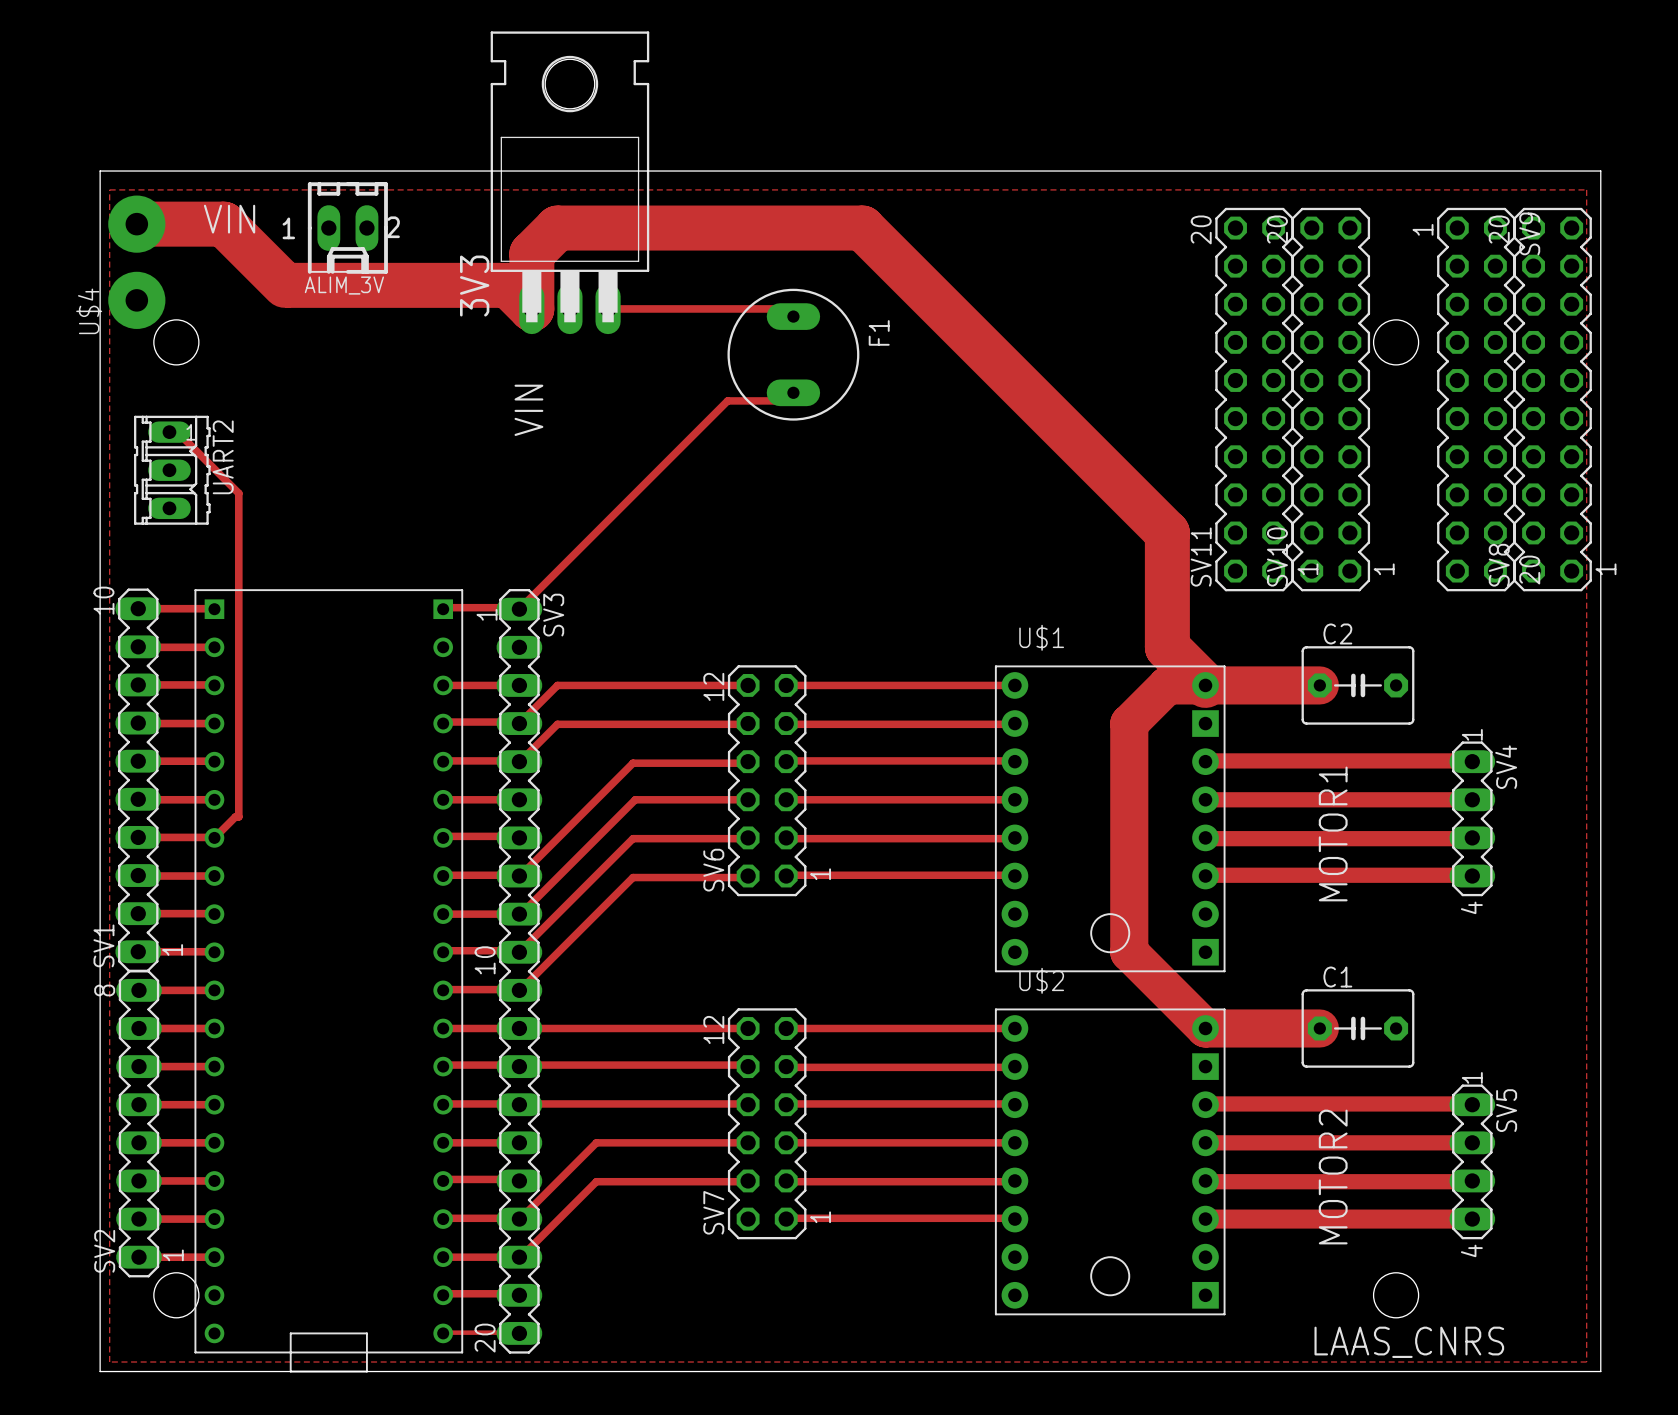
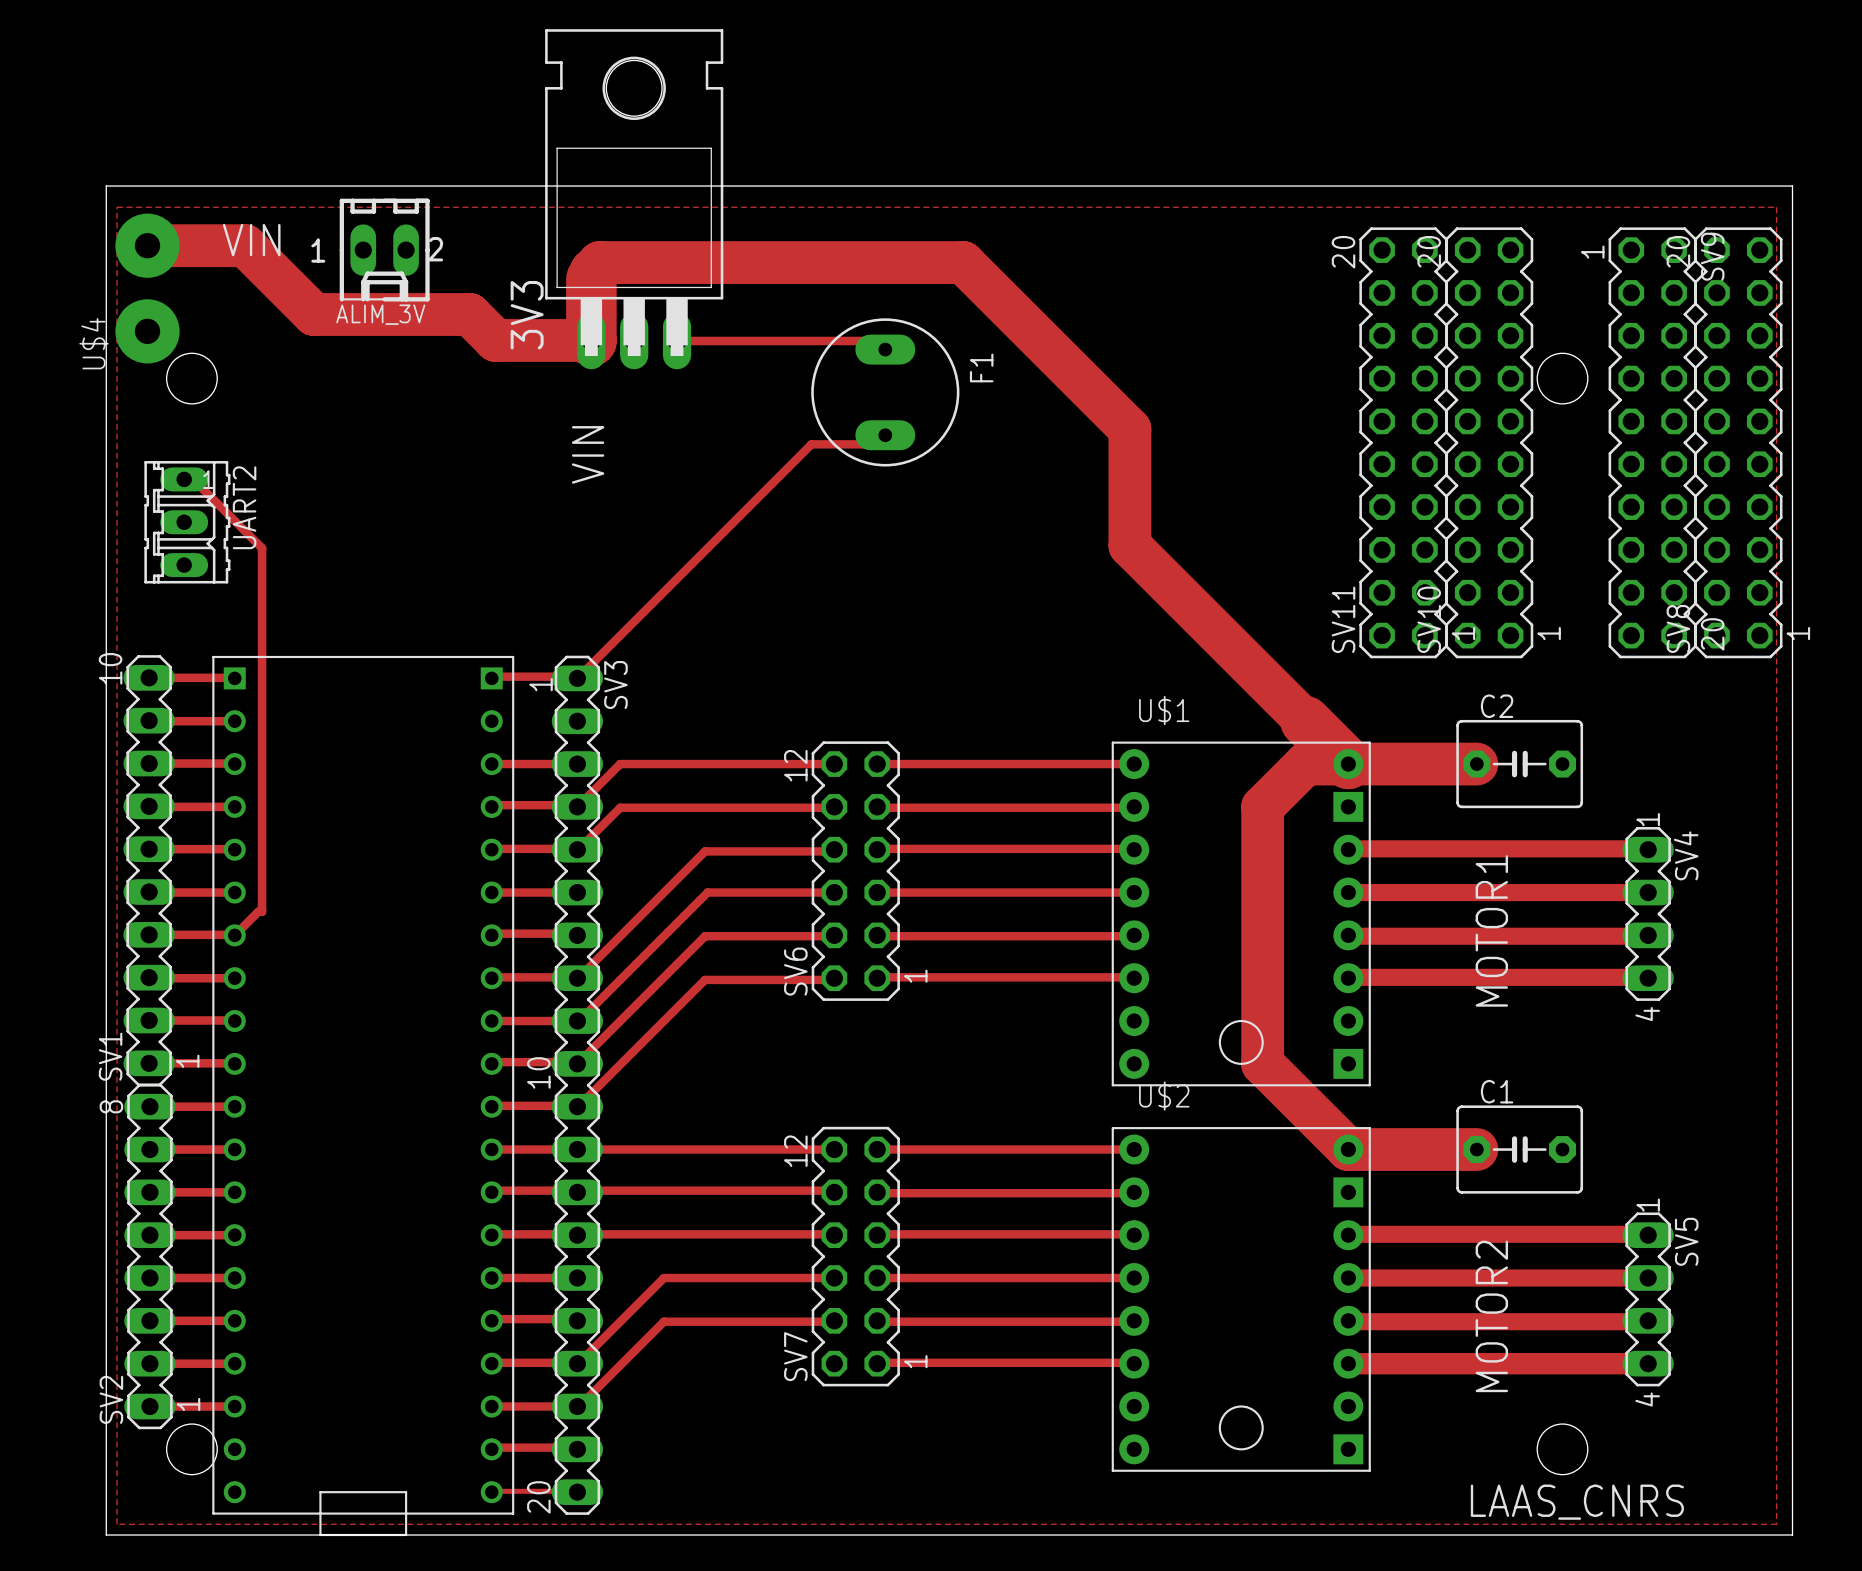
track width: thick (136, 224) (223, 224) (285, 285) -> thin (147, 245) (245, 245) (314, 314)
track: (531, 253) (557, 228) (862, 228) (1167, 532) (1167, 647) -> (591, 278) (591, 270) (599, 262) (963, 262) (1129, 429) (1129, 545) (1305, 721)
track width: thick (290, 285) (423, 285) -> thin (320, 314) (469, 314)
track: (423, 285) (508, 285) (531, 308) -> (469, 314) (495, 340) (591, 341)

